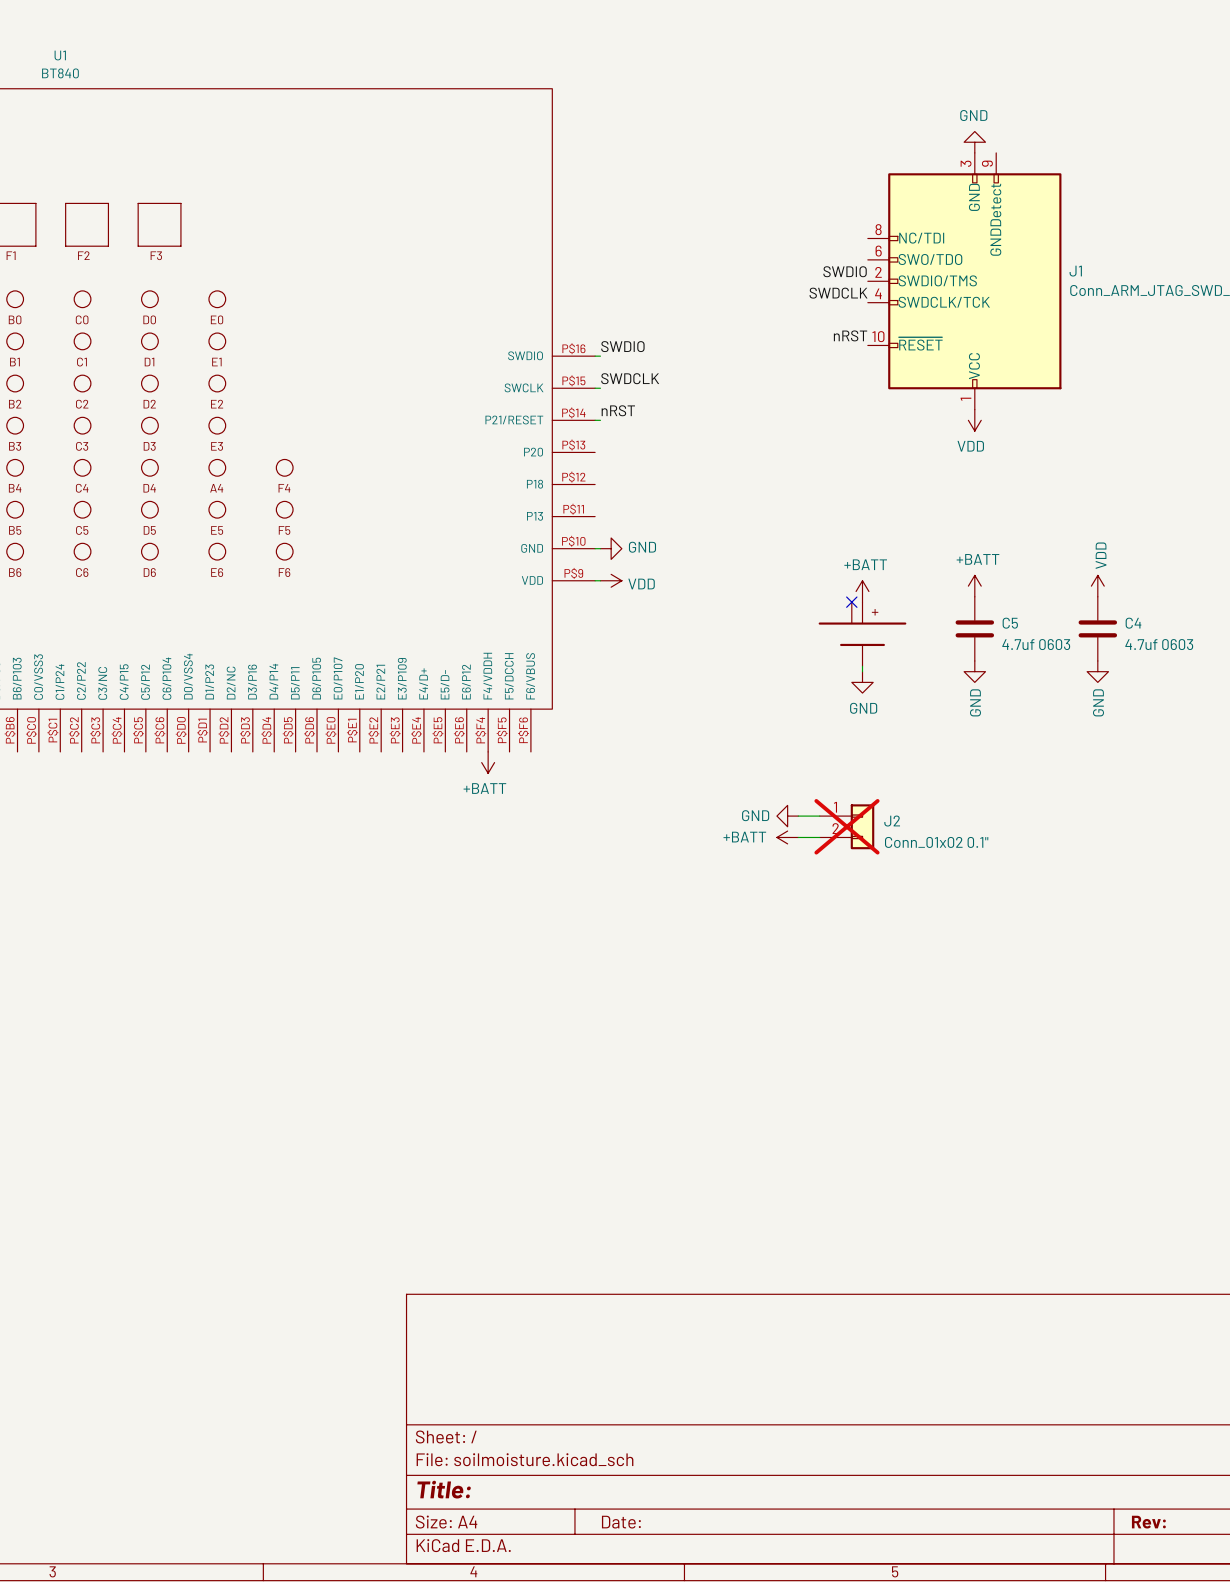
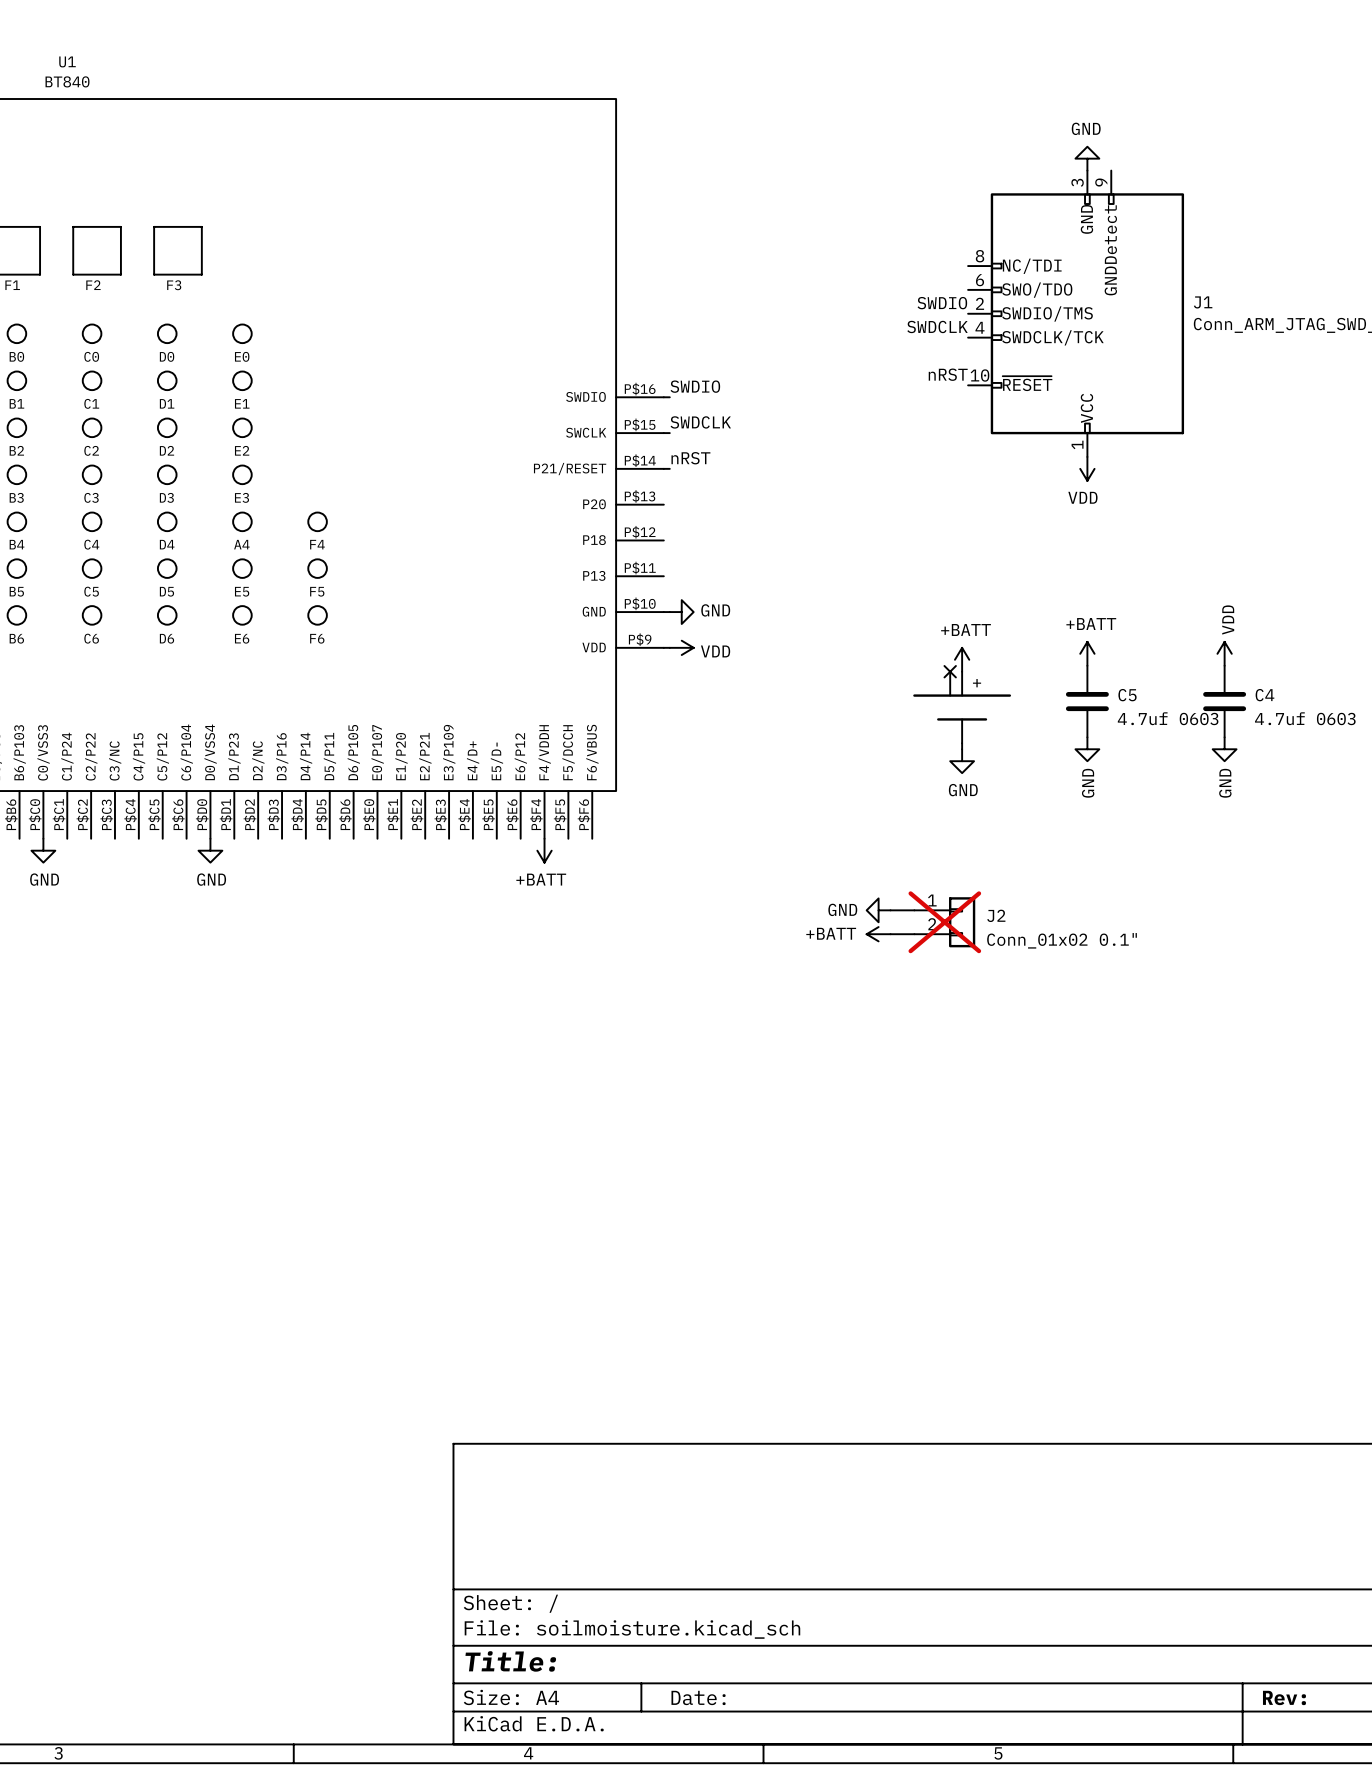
power symbol: none -> GND (43, 850)
power symbol: none -> GND (210, 850)

